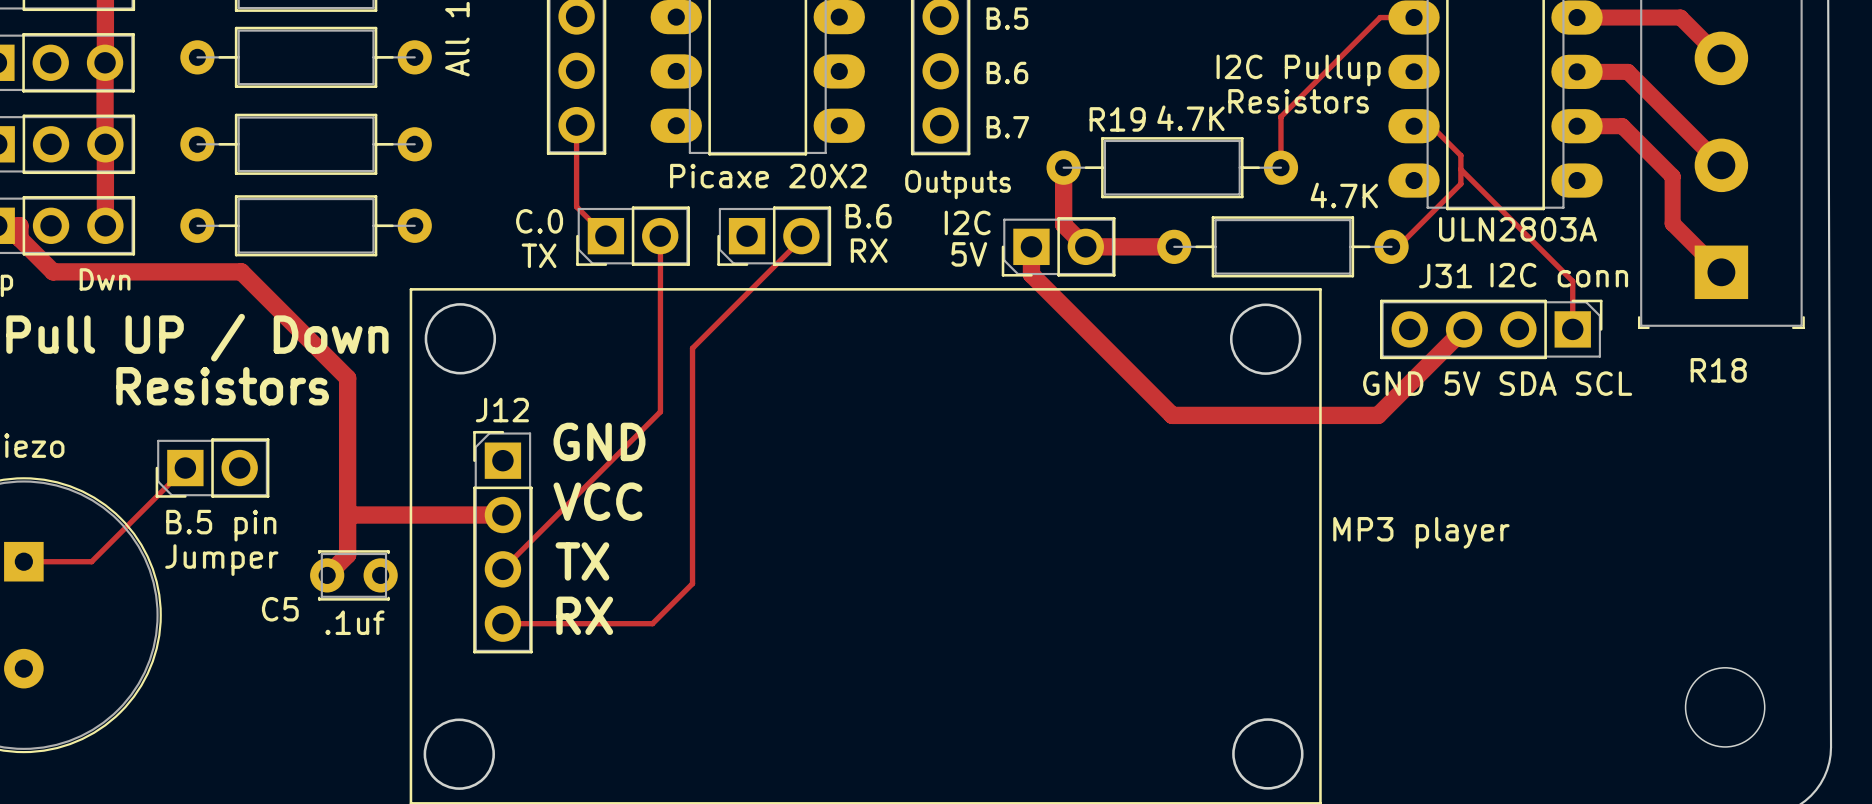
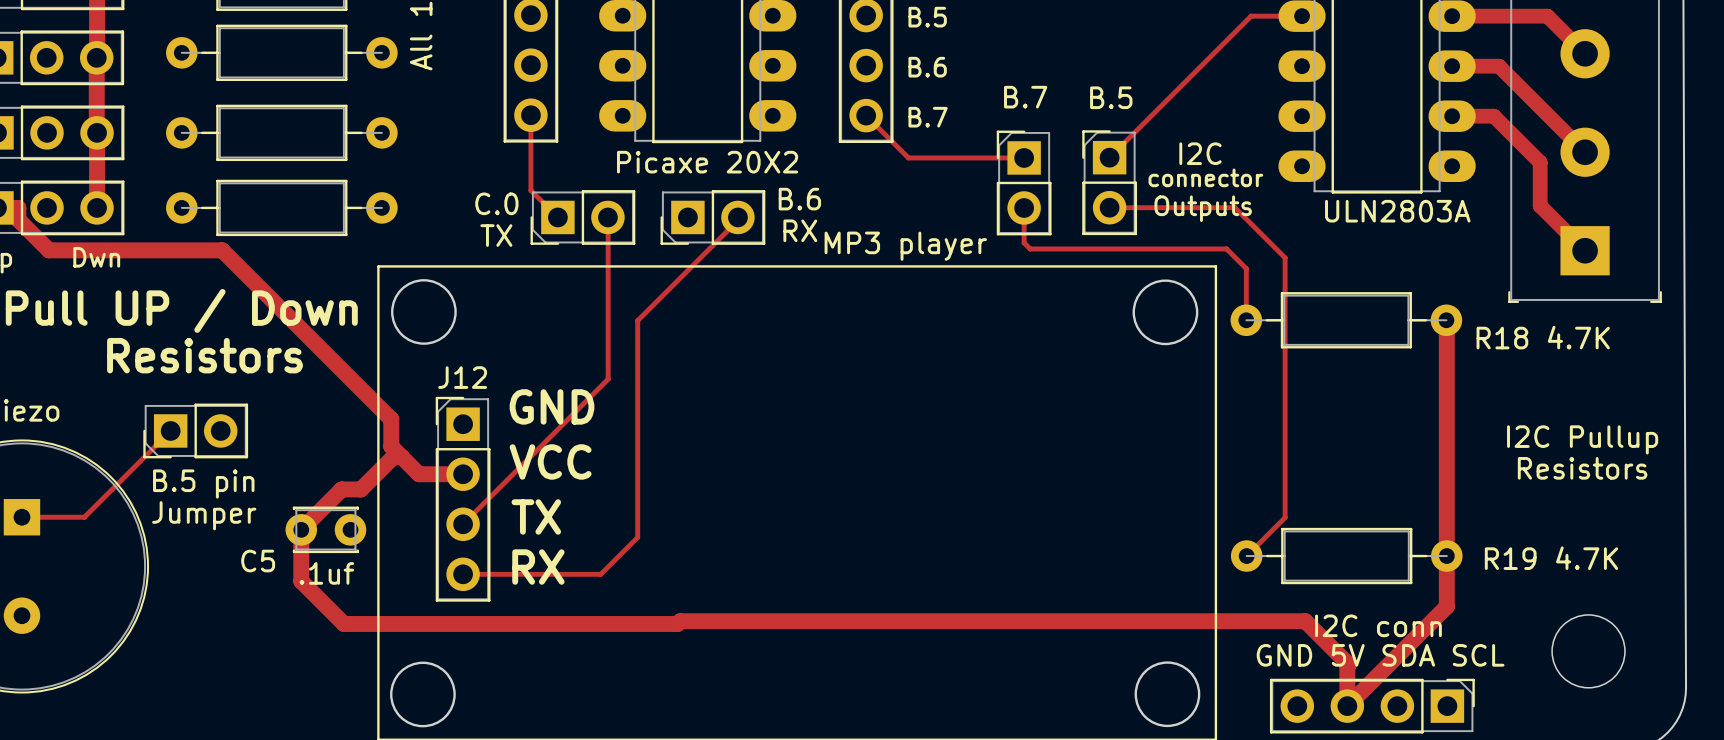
track: (1380, 17) (1280, 117) -> (1270, 16) (1251, 16) (1109, 157)
text: I2C Pullup (1298, 70) -> none
text: Resistors (1298, 101) -> none
track: (1280, 117) (1280, 167) -> none
track: none -> (866, 115) (908, 157) (1024, 157)
track: (1414, 126) (1431, 126) (1460, 155) (1460, 183) (1397, 246) (1391, 246) -> none
track: (1063, 167) (1063, 224) (1085, 246) (1174, 246) -> none
R19: 4.7K (1172, 167) -> none
track: (1460, 169) (1572, 281) (1572, 329) -> none
text position: Outputs (958, 184) -> Outputs (1203, 208)
text: none -> connector (1205, 177)
part: none -> B.7 (1024, 182)
part: none -> B.5 (1109, 182)
text position: I2C (967, 222) -> I2C (1200, 153)
track: none -> (1024, 208) (1024, 242) (1030, 248) (1226, 248) (1246, 268) (1246, 320)
track: none -> (1109, 207) (1234, 207) (1285, 257) (1285, 517) (1246, 556)
track: (1031, 246) (1031, 274) (1172, 415) (1378, 415) (1464, 329) -> none
part: 5V (1058, 246) -> none
R18: 4.7K (1282, 246) -> none
J31: I2C conn (1491, 329) -> none
part: none -> R18 4.7K (1346, 320)
track: none -> (1446, 320) (1446, 606) (1347, 706) (1348, 664) (1305, 621) (680, 621) (677, 623) (344, 623) (301, 581) (301, 529)
track: (347, 378) (347, 554) -> (320, 348) (391, 419) (391, 446) (418, 474)
text position: GND 5V SDA SCL (1497, 383) -> GND 5V SDA SCL (1380, 655)
text: none -> I2C Pullup (1582, 439)
track: none -> (401, 457) (393, 457) (360, 489) (341, 489) (320, 510)
text: none -> Resistors (1582, 468)
track: (347, 515) (455, 515) -> none
J12 value position: MP3 player (1421, 532) -> MP3 player (905, 246)
part: none -> R19 4.7K (1346, 556)
part: none -> I2C conn (1372, 706)

